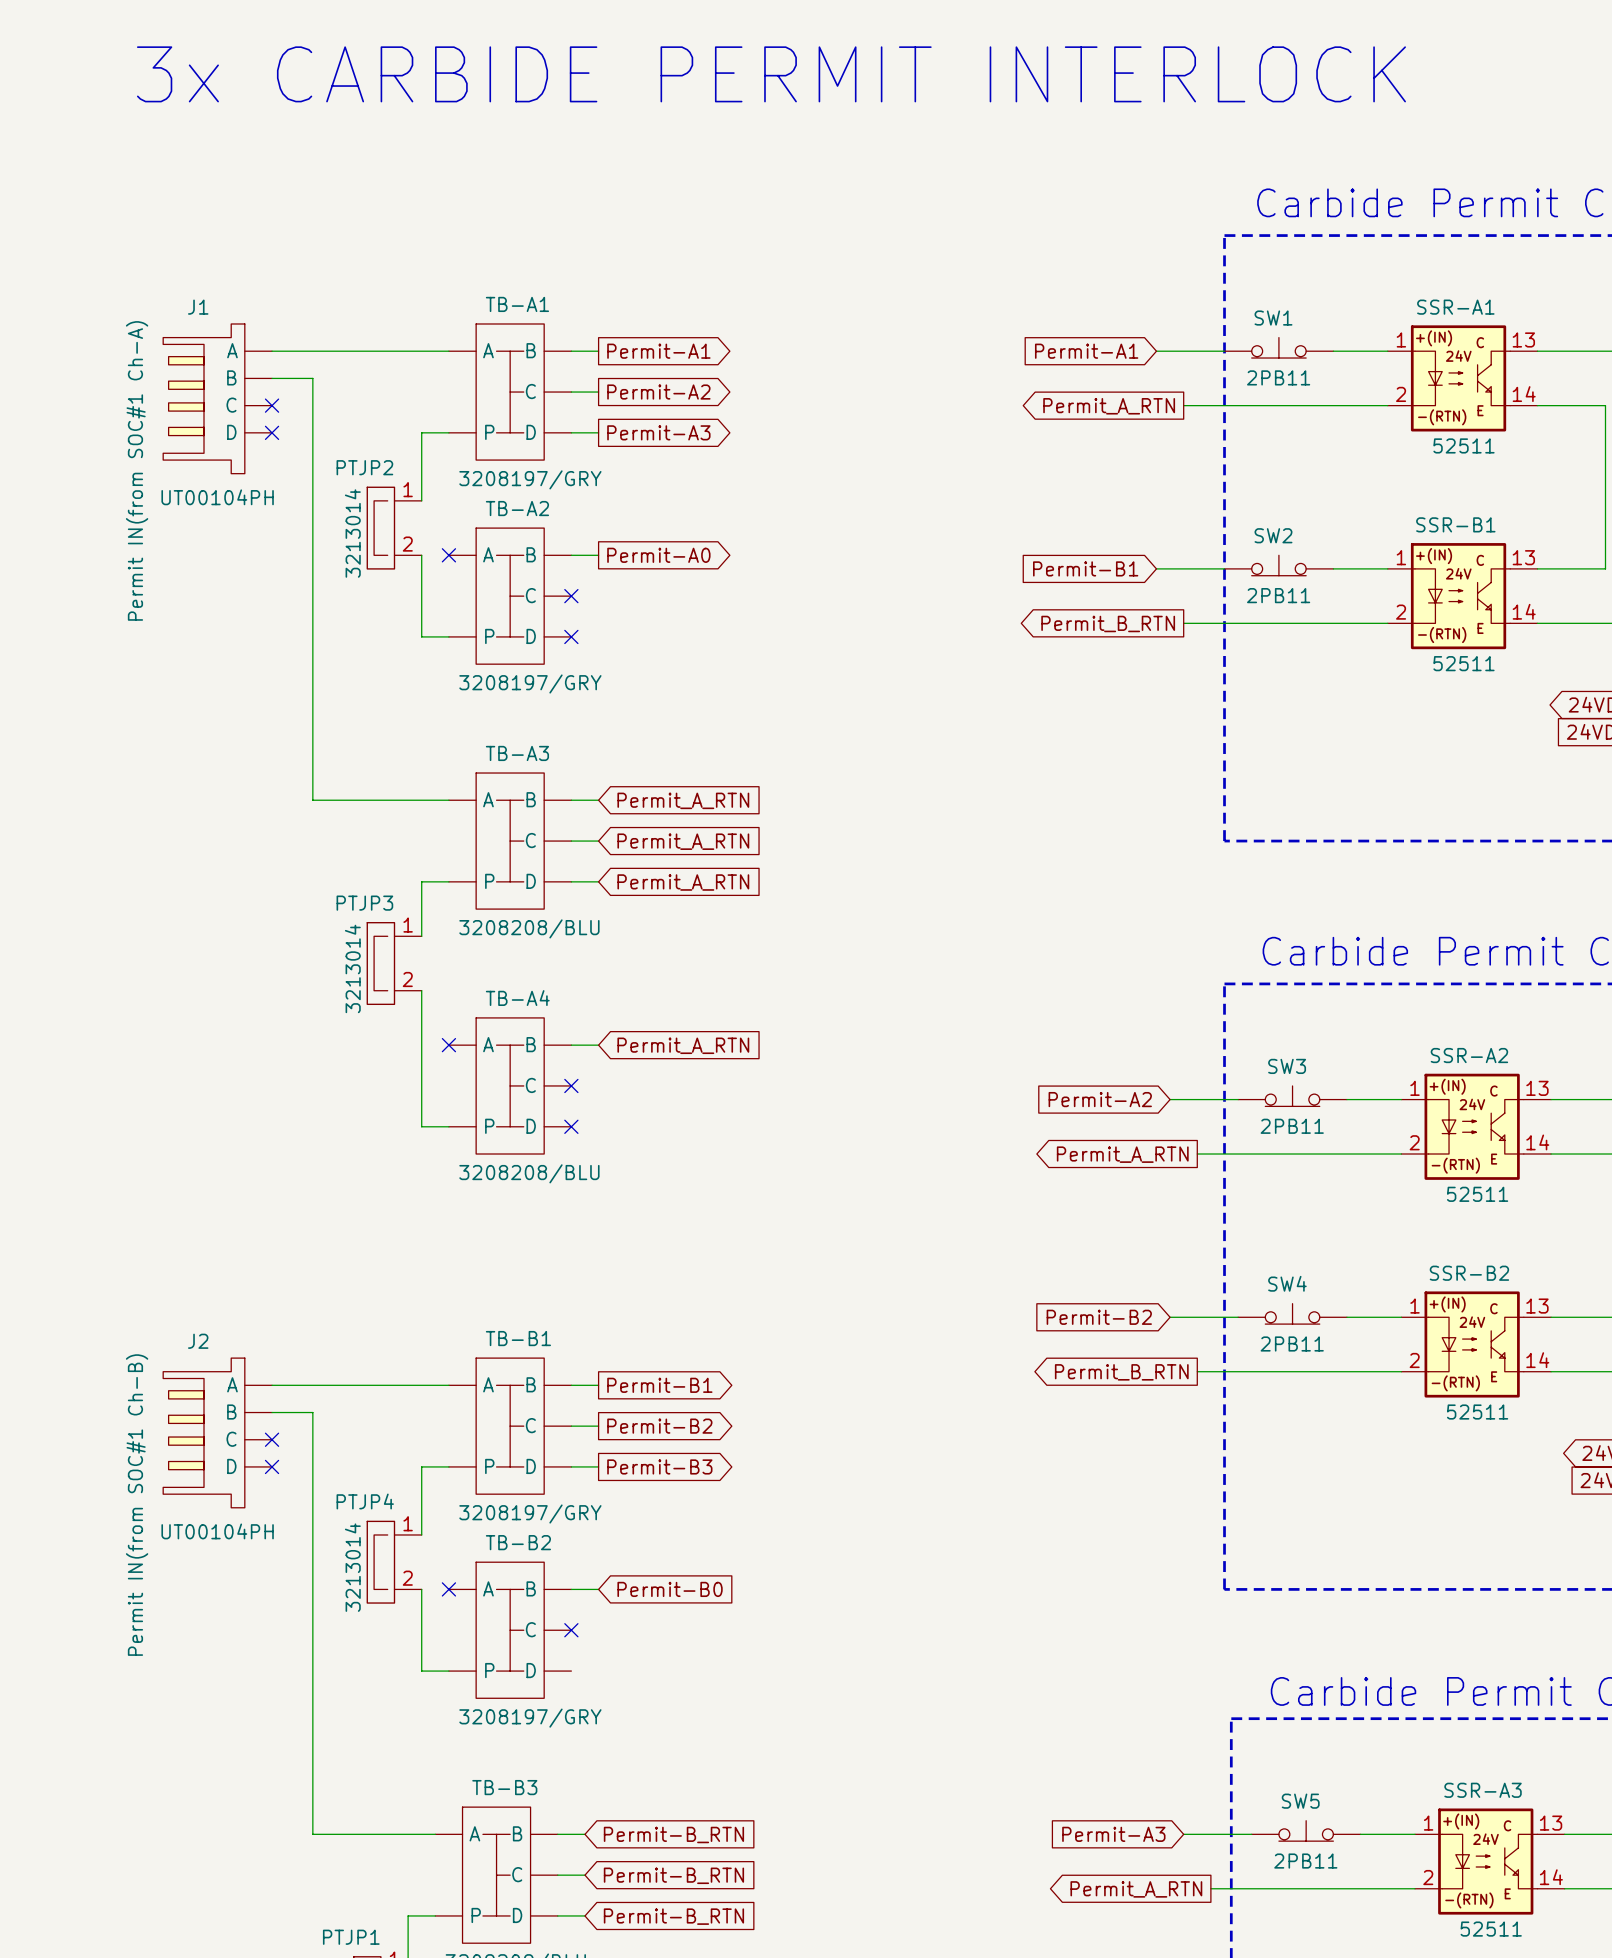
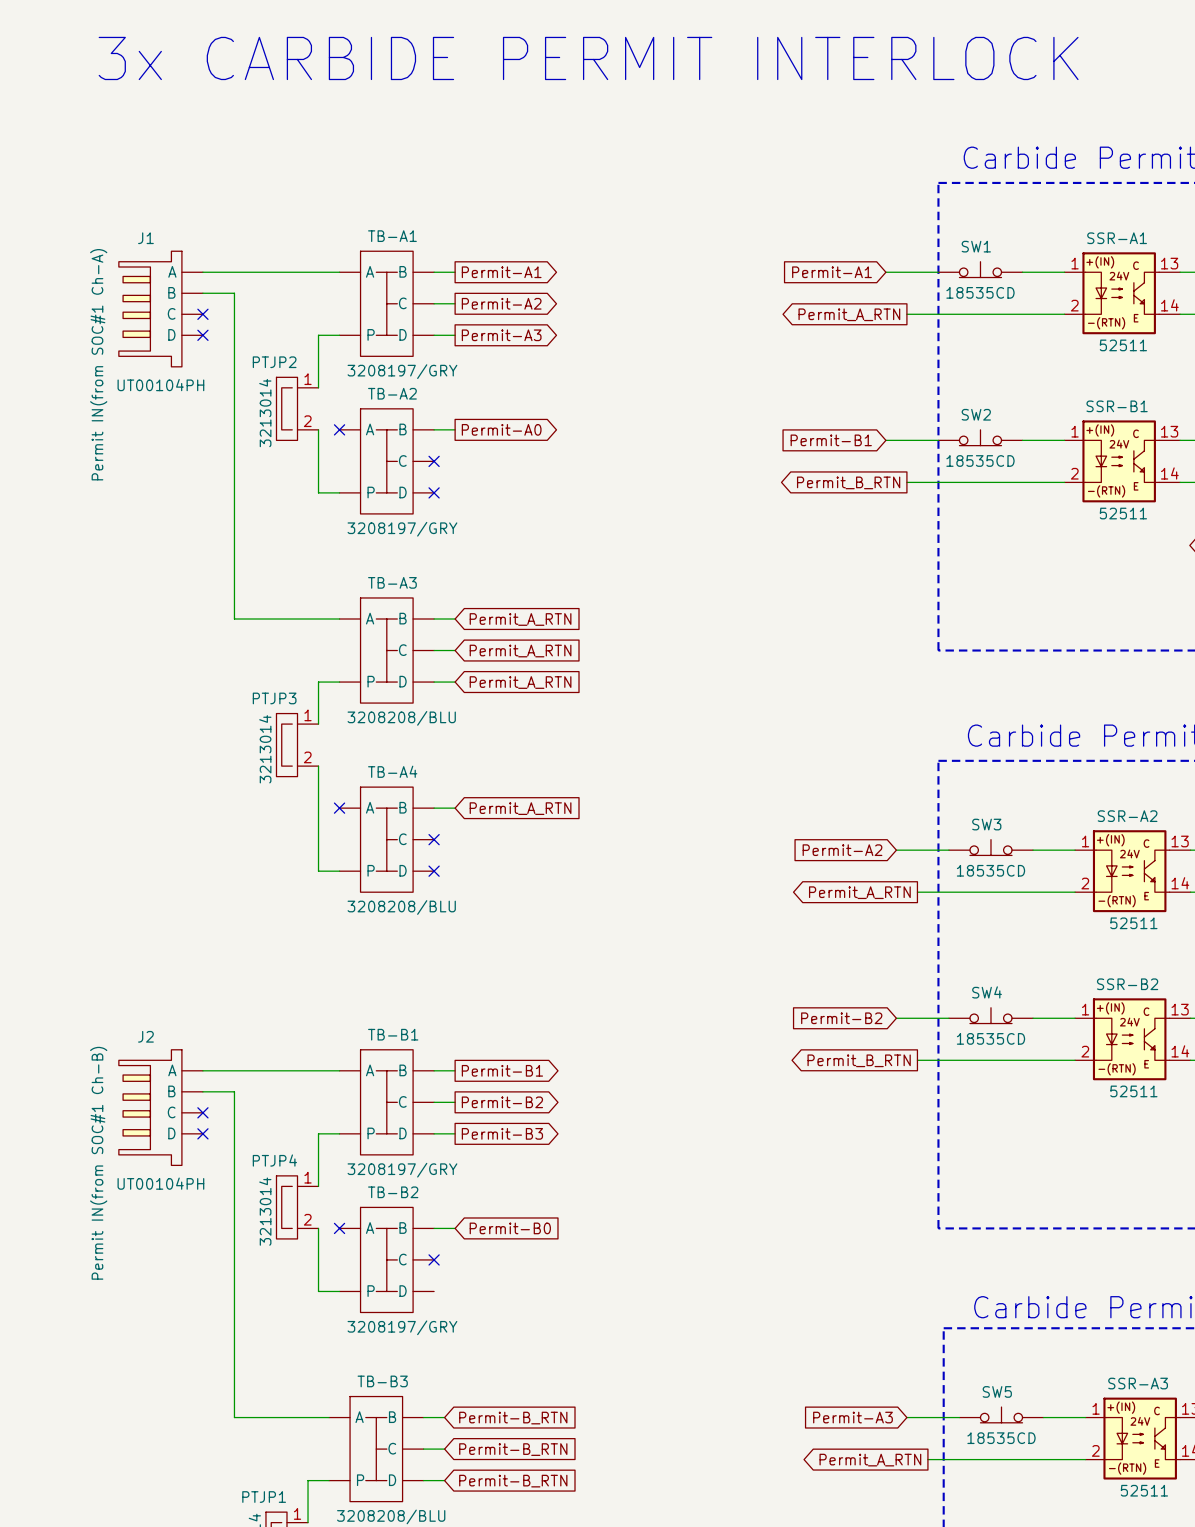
SW1 value: 2PB11 (1278, 377) -> 18535CD (980, 292)
SW2 value: 2PB11 (1278, 595) -> 18535CD (980, 460)
SW3 value: 2PB11 (1292, 1126) -> 18535CD (990, 870)
SW4 value: 2PB11 (1292, 1343) -> 18535CD (990, 1038)
SW5 value: 2PB11 (1305, 1861) -> 18535CD (1001, 1438)

